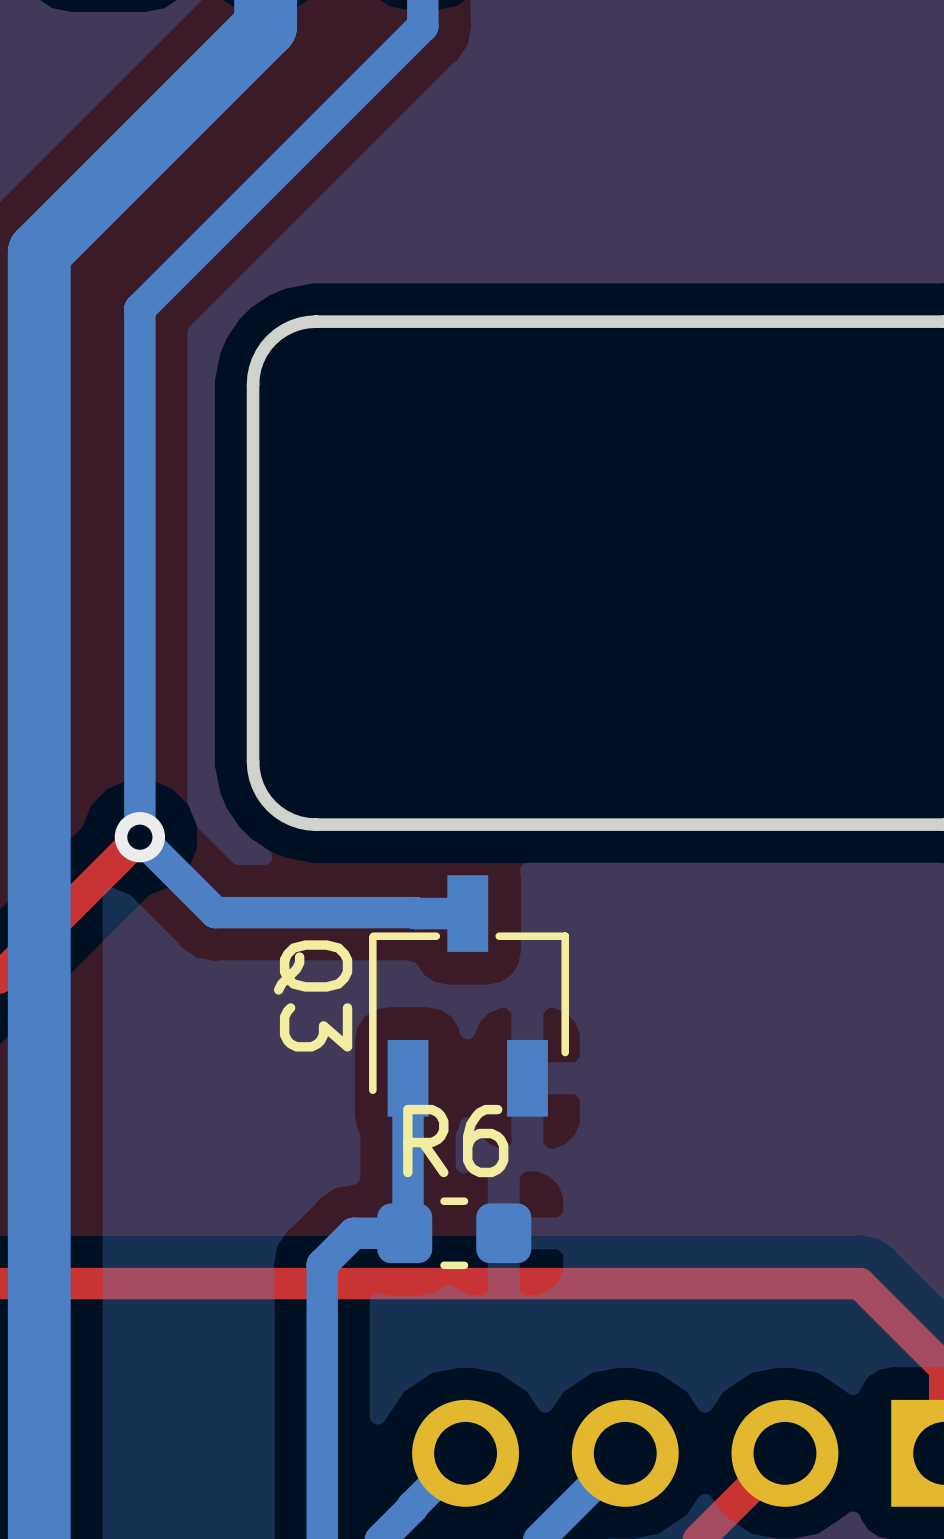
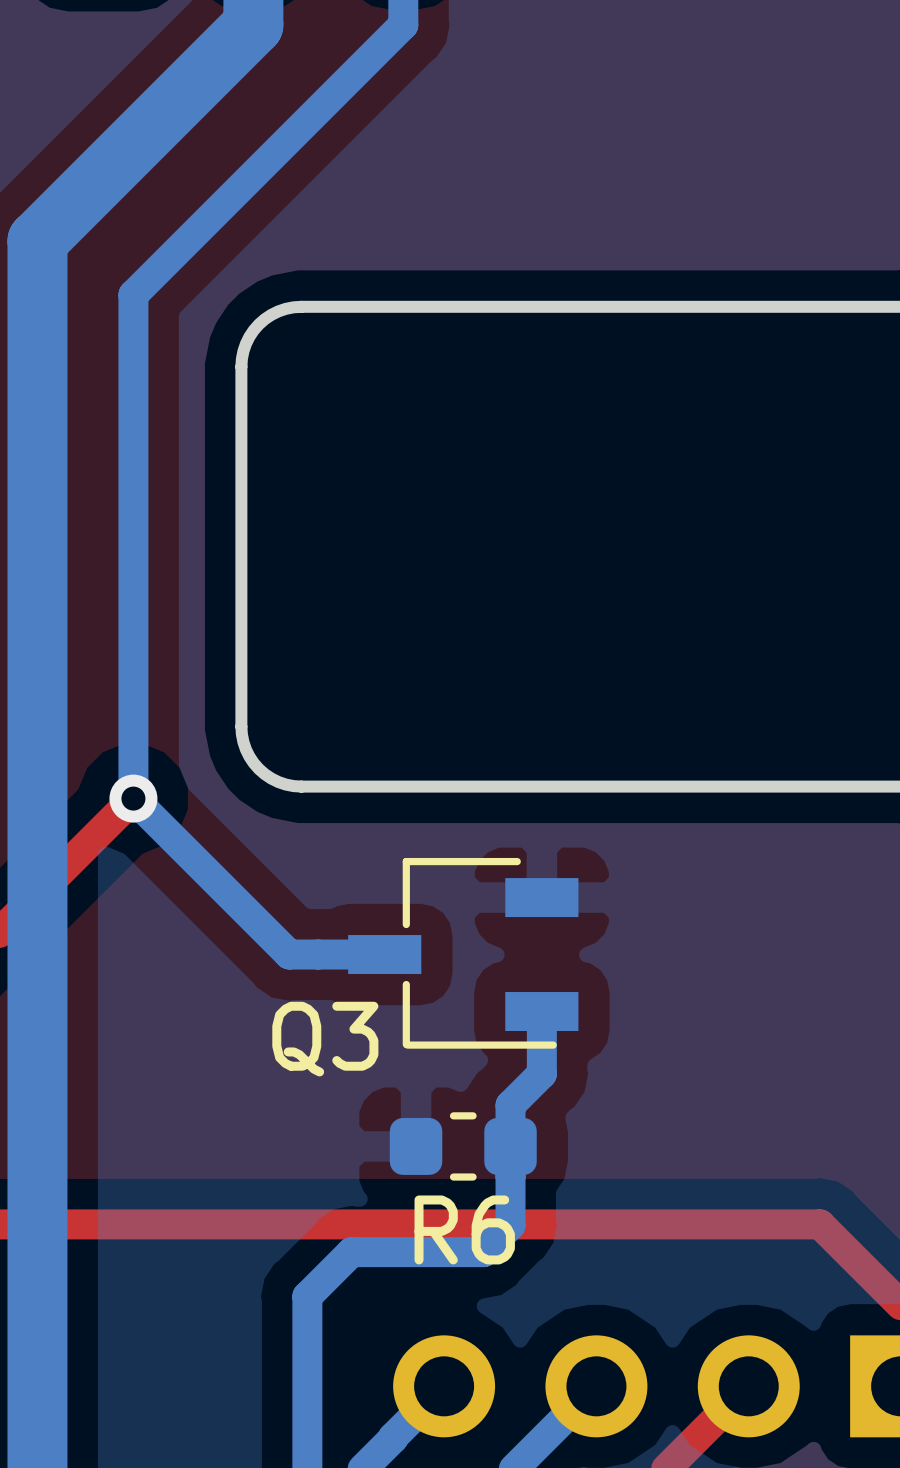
bottom track: (215, 912) (467, 913) -> (205, 870) (289, 954) (384, 954)
Q3 rotation: 0° (469, 995) -> 90° counterclockwise (463, 953)
bottom track: (408, 1078) (408, 1229) (404, 1233) (353, 1233) (322, 1264) (322, 1359) -> (541, 1011) (541, 1073) (510, 1105) (510, 1225) (483, 1252) (351, 1252) (307, 1296)
R6 name position: R6 (455, 1141) -> R6 (464, 1229)
R6 position: (454, 1233) -> (463, 1146)

